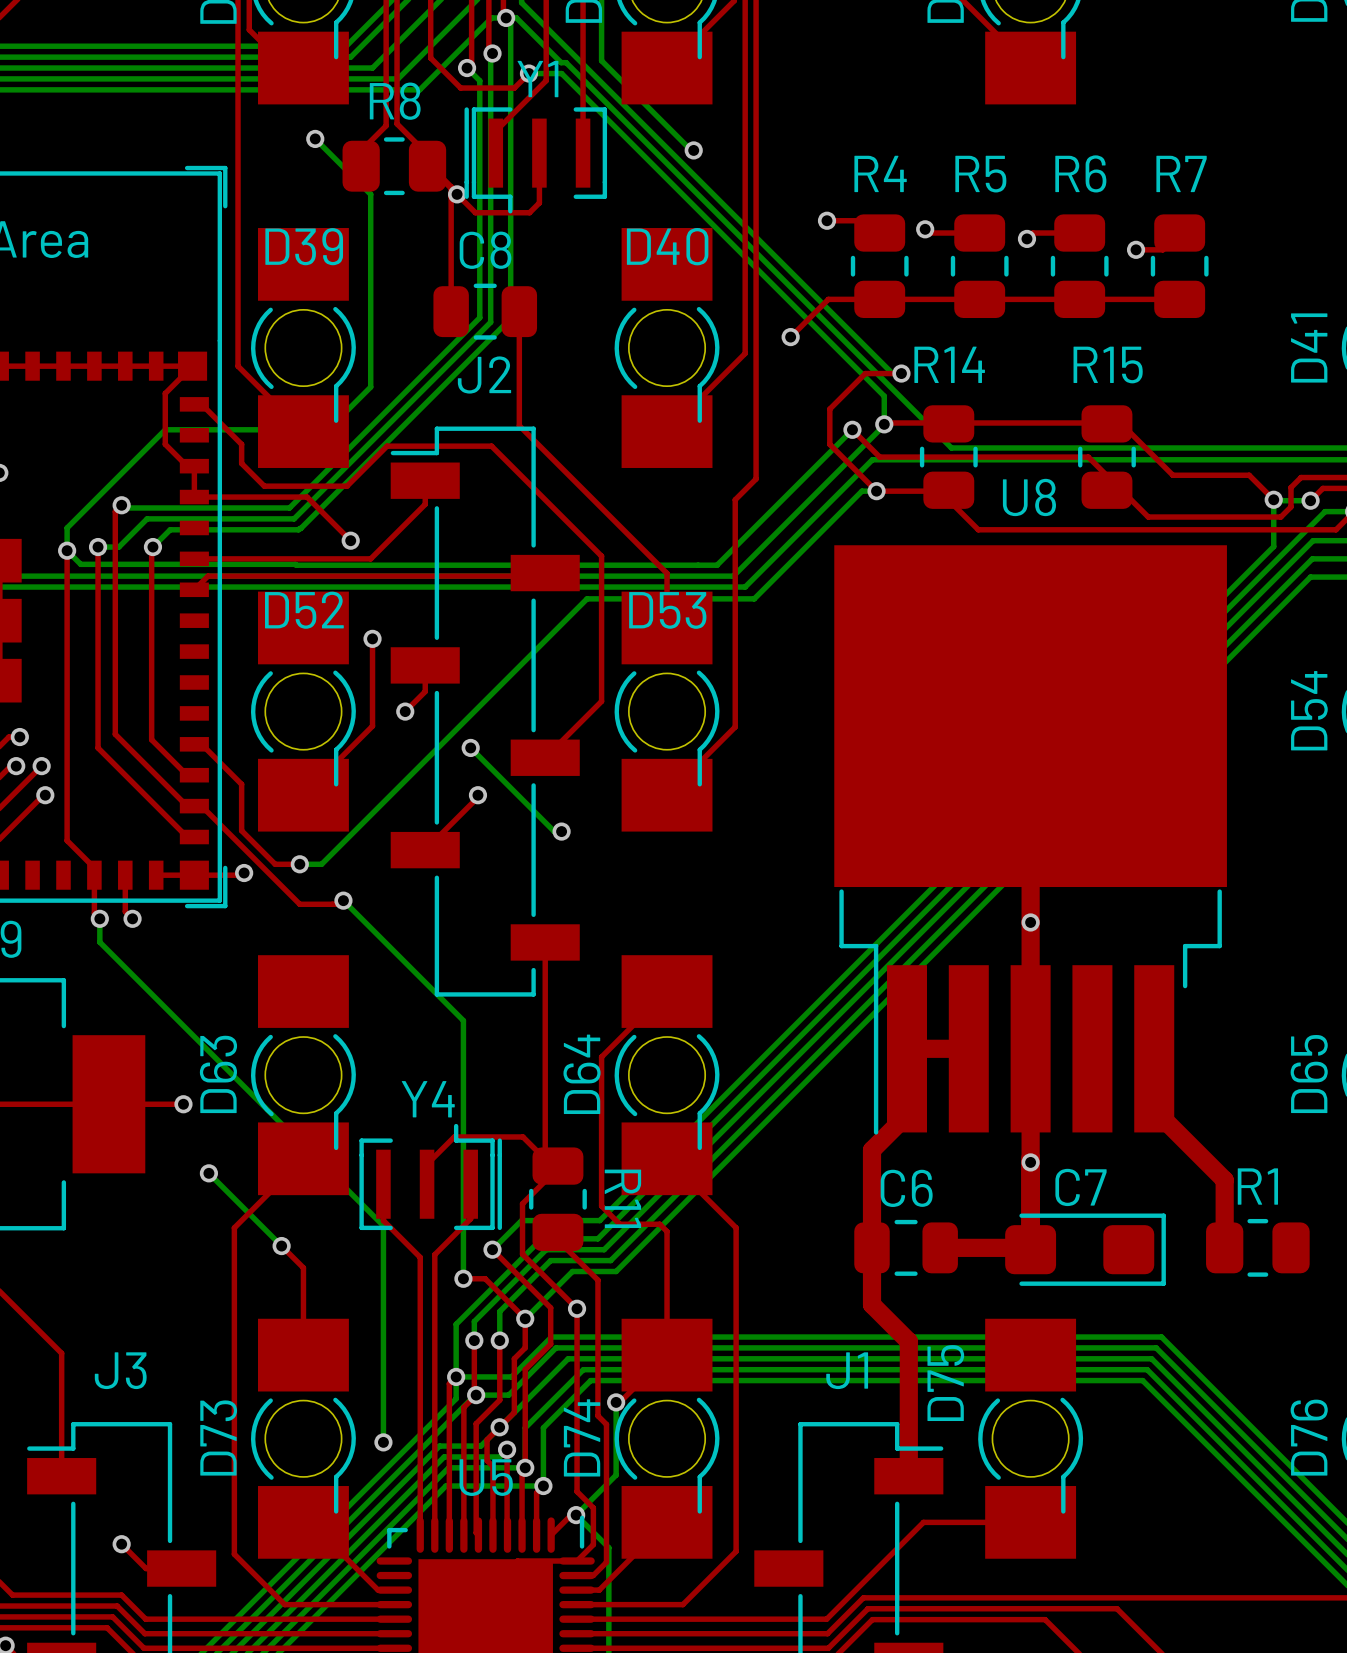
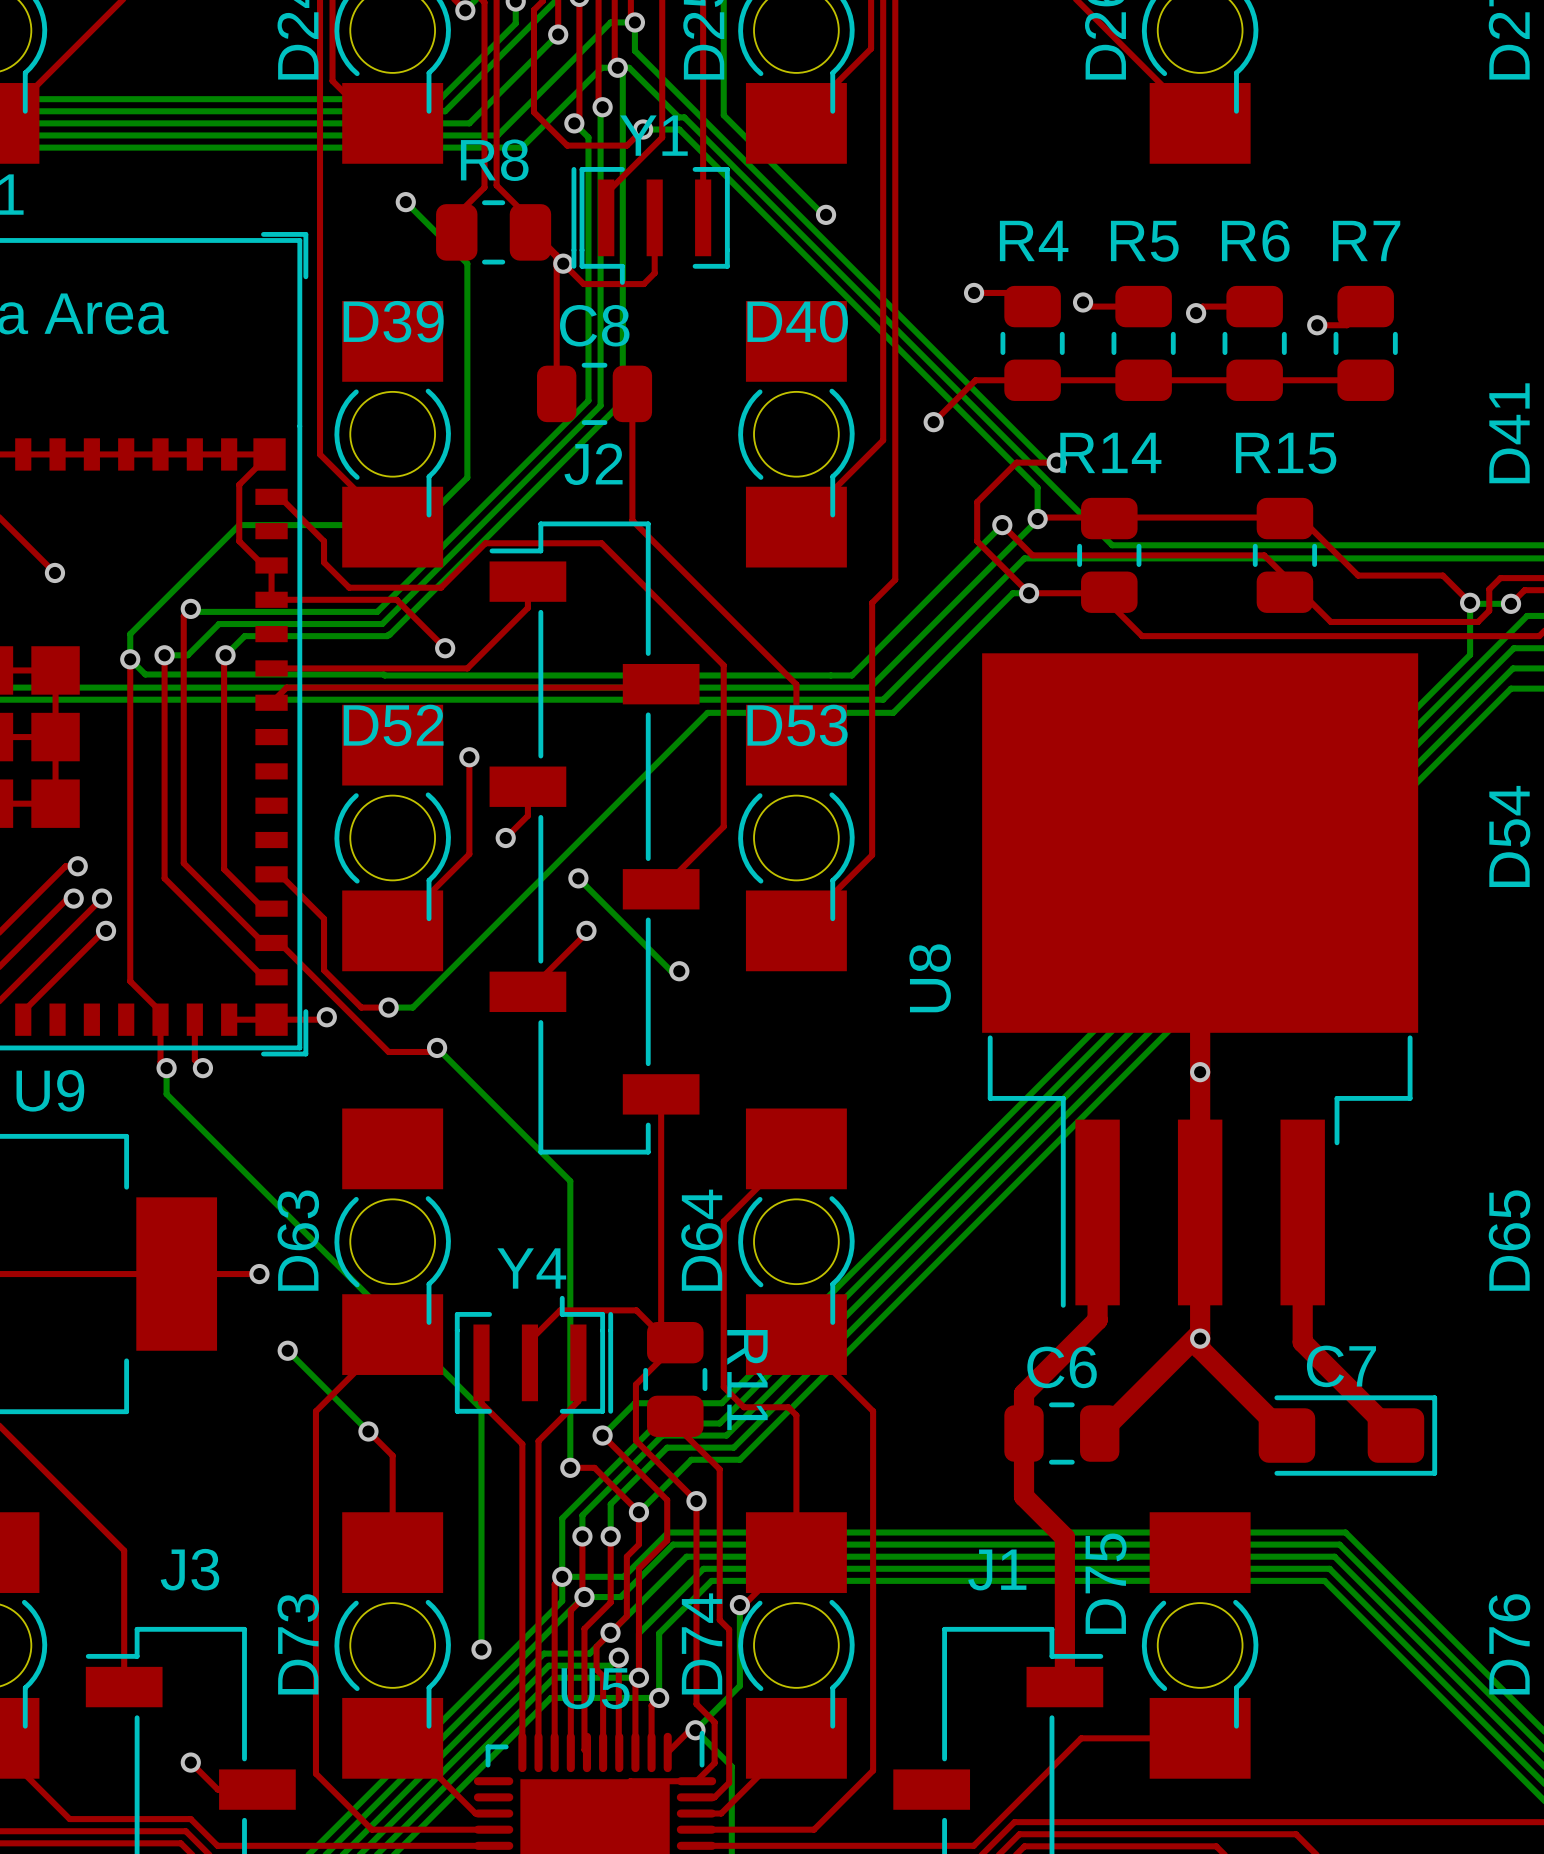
U8 name rotation: 0° (1029, 497) -> 90° counterclockwise (930, 978)
U8 name position: U8 (1029, 497) -> U8 (930, 978)
U8 footprint: [834, 545, 1227, 1135] -> [982, 653, 1419, 1308]
top track: (968, 1048) (907, 1048) (907, 1115) (872, 1150) (872, 1211) -> (1097, 1212) (1097, 1320) (1024, 1393)
top track: none -> (1302, 1212) (1302, 1342) (1395, 1435)
top track: (1154, 1048) (1154, 1016) (1154, 1109) (1224, 1180) (1224, 1247) -> none
top track: (1030, 1171) (1030, 1249) -> (1200, 1348) (1286, 1435)
top track: (940, 1247) (1030, 1247) -> (1099, 1433) (1200, 1333)
R1: (1257, 1247) -> none
C7 position: (1085, 1249) -> (1347, 1435)

